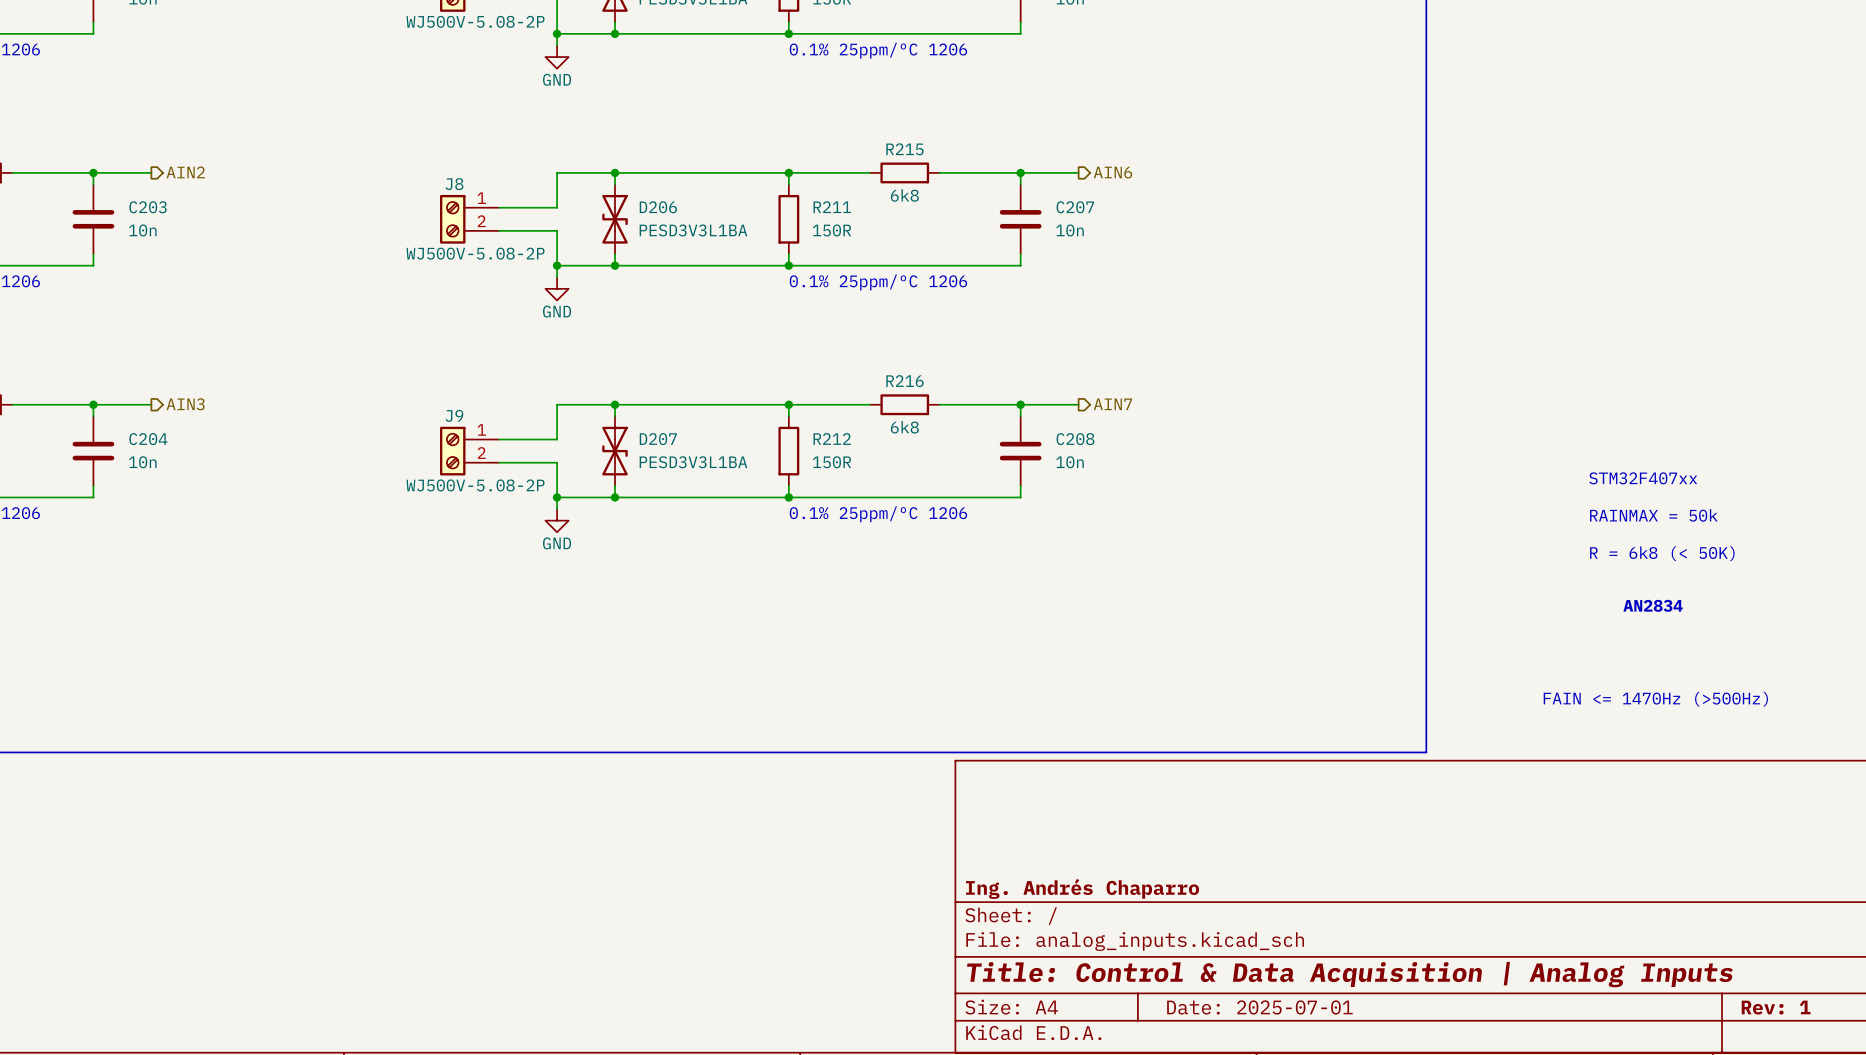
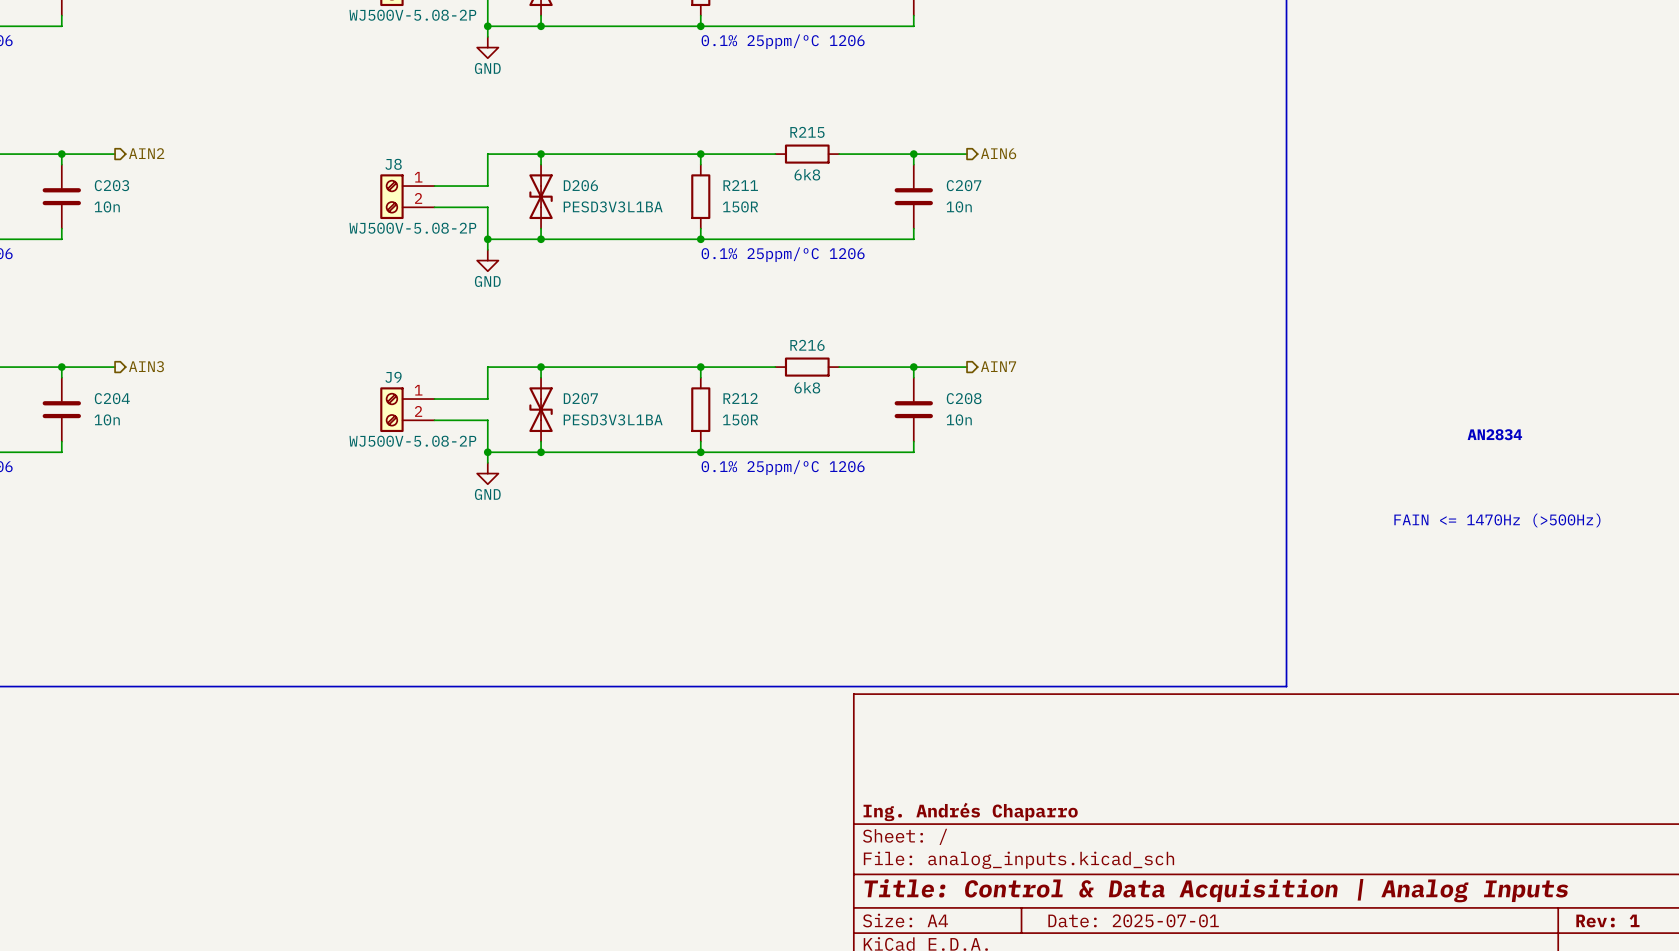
text: STM32F407xx (1643, 478) -> none
text: RAINMAX = 50k (1653, 515) -> none
text: R = 6k8 (< 50K) (1662, 553) -> none
text position: AN2834 (1653, 605) -> AN2834 (1494, 434)
text position: FAIN <= 1470Hz (>500Hz) (1655, 699) -> FAIN <= 1470Hz (>500Hz) (1497, 520)

